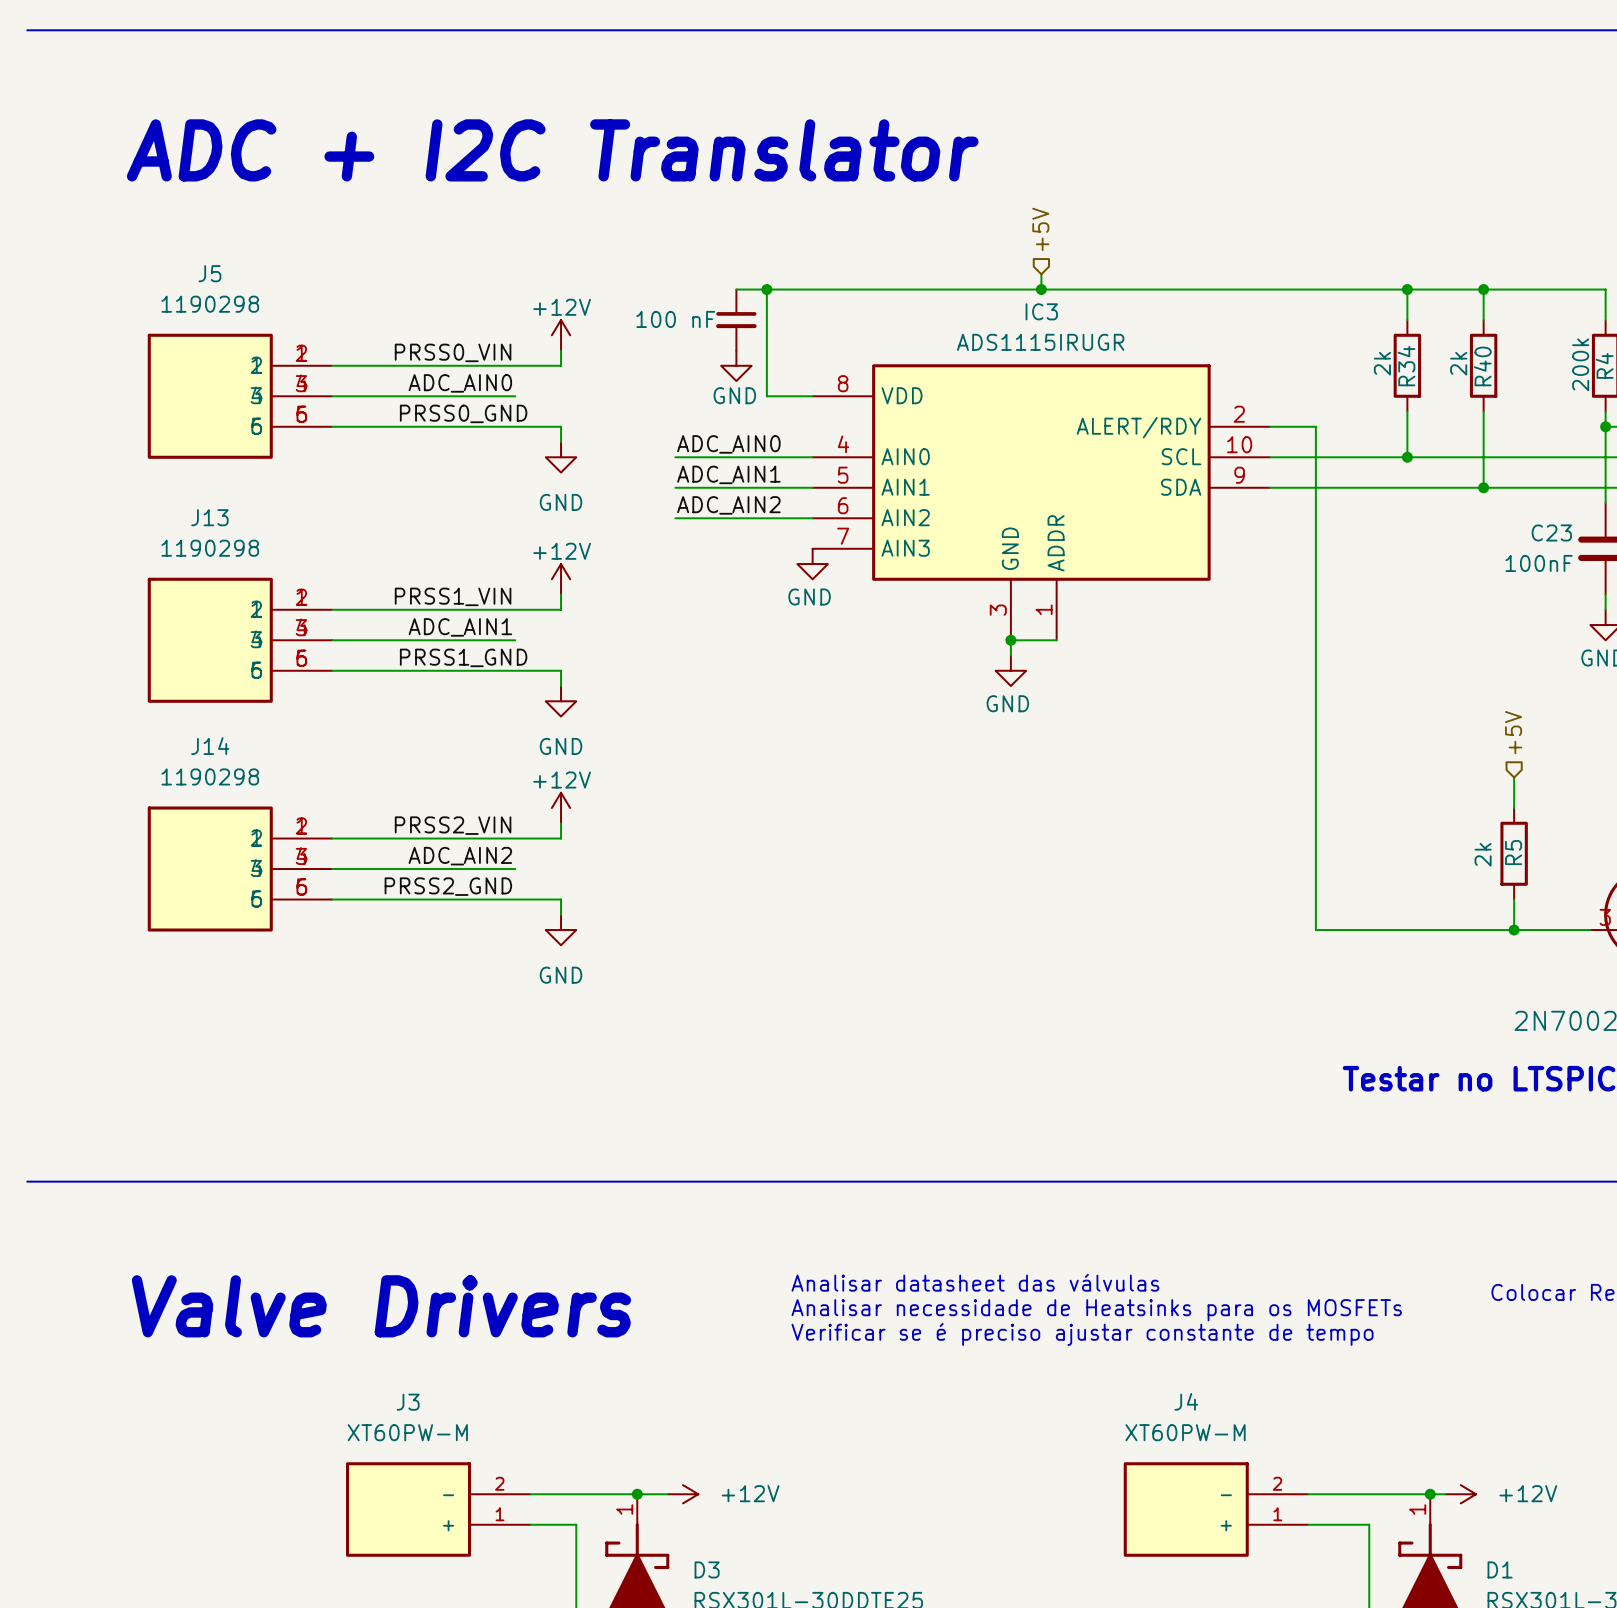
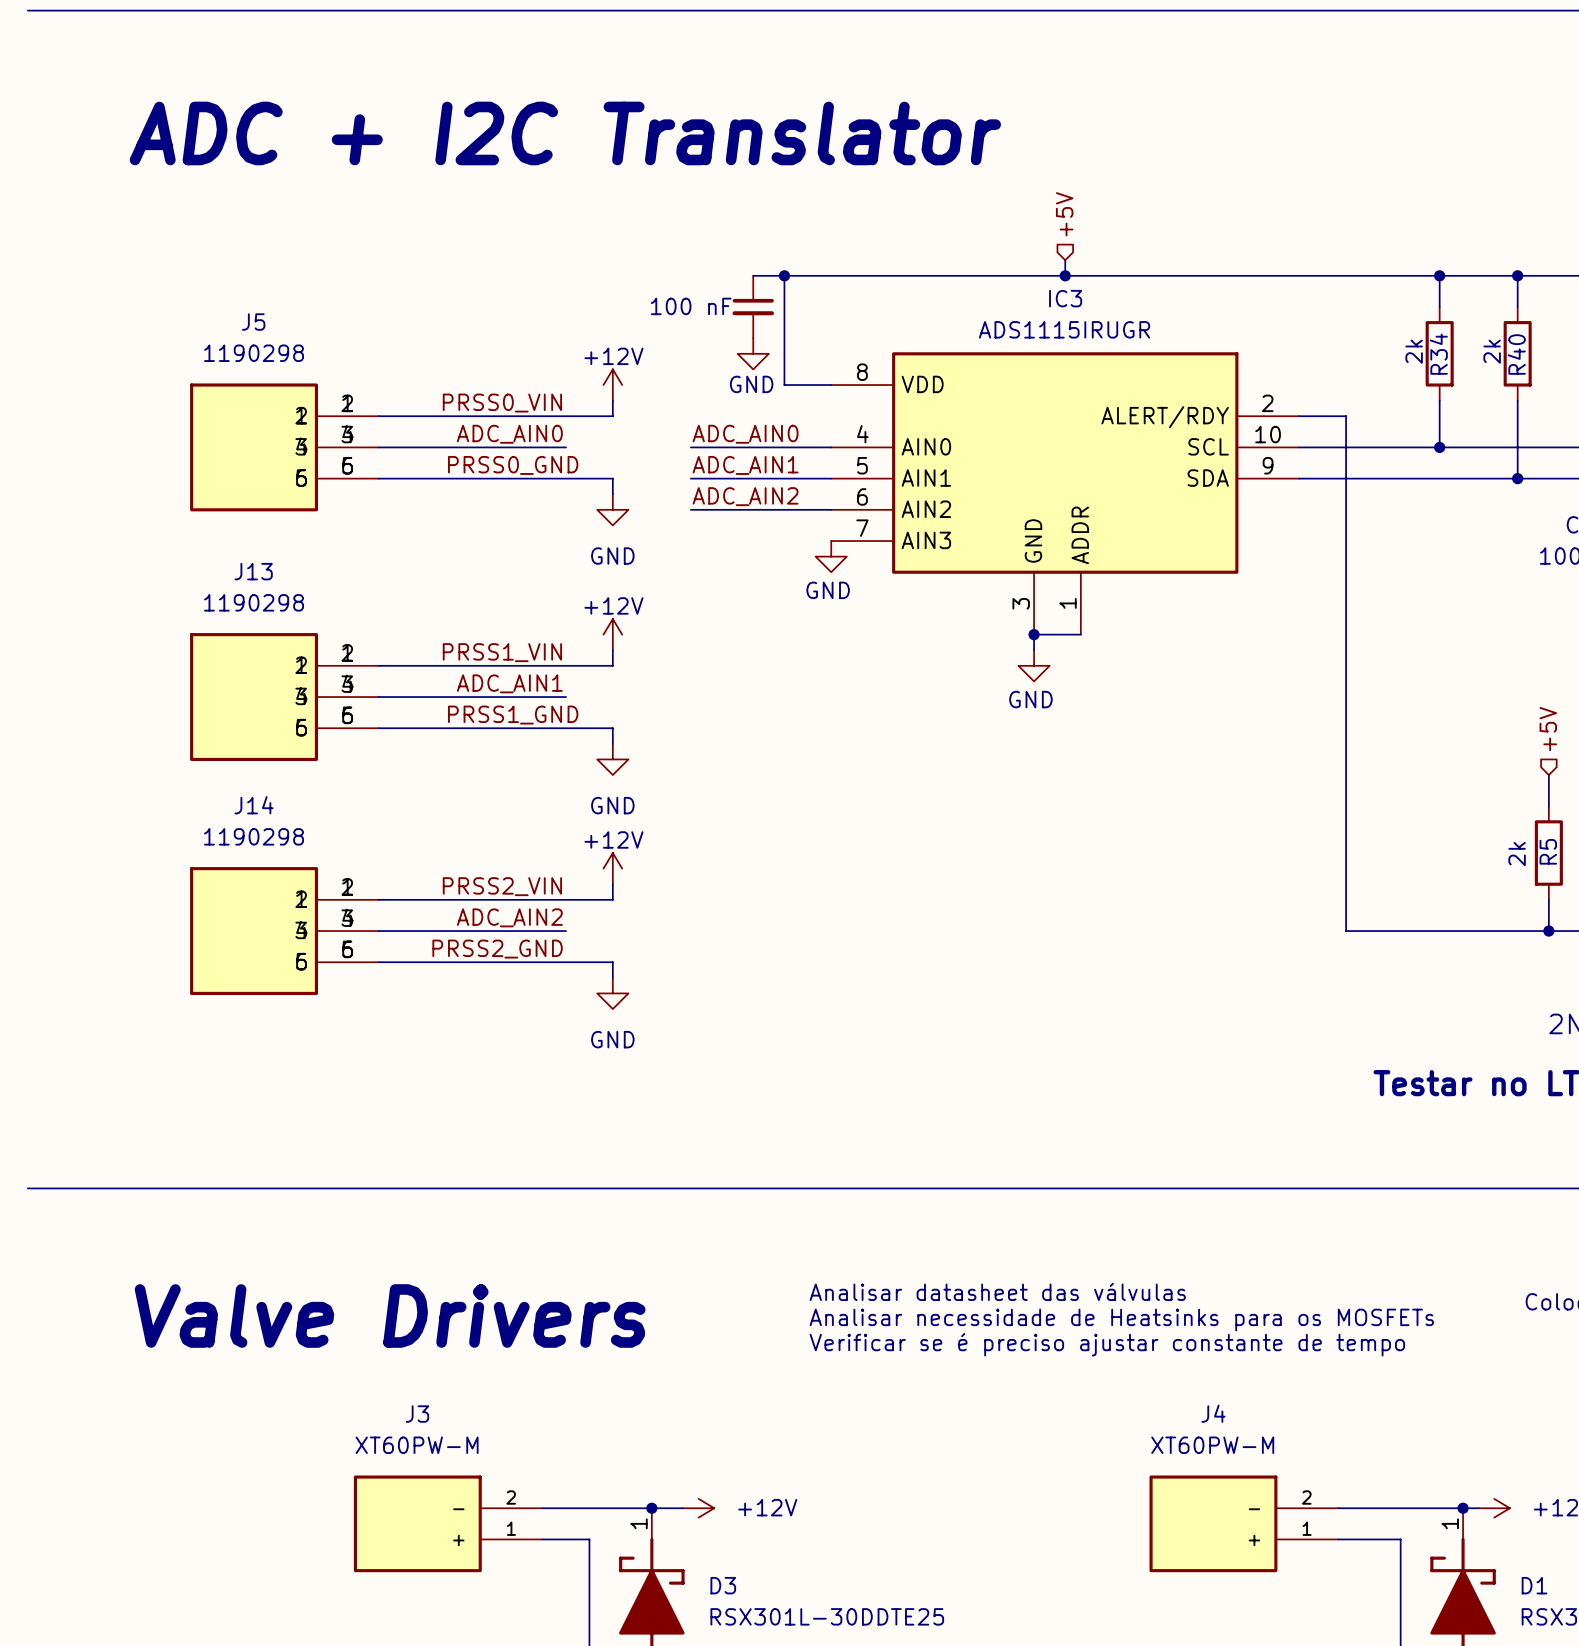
power symbol position: +12V (561, 335) -> +12V (612, 385)
wire: (561, 350) (561, 365) (332, 365) -> none
label position: PRSS0_VIN (453, 352) -> PRSS0_VIN (502, 403)
label position: ADC_AIN0 (460, 383) -> ADC_AIN0 (509, 434)
J5 position: (240, 396) -> (284, 447)
wire: (332, 396) (515, 396) -> (378, 447) (566, 447)
label position: PRSS0_GND (463, 413) -> PRSS0_GND (513, 465)
wire: (561, 426) (561, 442) -> (573, 416) (612, 416) (612, 400)
power symbol position: GND (561, 457) -> GND (612, 509)
wire: none -> (378, 478) (612, 478) (612, 494)
power symbol position: +12V (561, 579) -> +12V (612, 634)
wire: (561, 594) (561, 609) (332, 609) -> none
label position: PRSS1_VIN (453, 596) -> PRSS1_VIN (502, 652)
label position: ADC_AIN1 (460, 627) -> ADC_AIN1 (509, 683)
J13 position: (240, 640) -> (284, 697)
wire: (332, 640) (515, 640) -> (378, 697) (566, 697)
label position: PRSS1_GND (463, 657) -> PRSS1_GND (513, 715)
wire: (561, 670) (561, 686) -> (573, 665) (612, 665) (612, 650)
power symbol position: GND (561, 701) -> GND (612, 759)
wire: none -> (378, 728) (612, 728) (612, 743)
power symbol position: +12V (561, 808) -> +12V (612, 868)
wire: (561, 823) (561, 838) (332, 838) -> none
label position: PRSS2_VIN (453, 825) -> PRSS2_VIN (502, 886)
label position: ADC_AIN2 (460, 856) -> ADC_AIN2 (509, 917)
J14 position: (240, 869) -> (284, 931)
wire: (332, 869) (515, 869) -> (378, 931) (566, 931)
label position: PRSS2_GND (448, 886) -> PRSS2_GND (497, 949)
wire: (561, 899) (561, 914) -> (573, 899) (612, 899) (612, 884)
power symbol position: GND (561, 930) -> GND (612, 993)
wire: none -> (378, 962) (612, 962) (612, 977)

